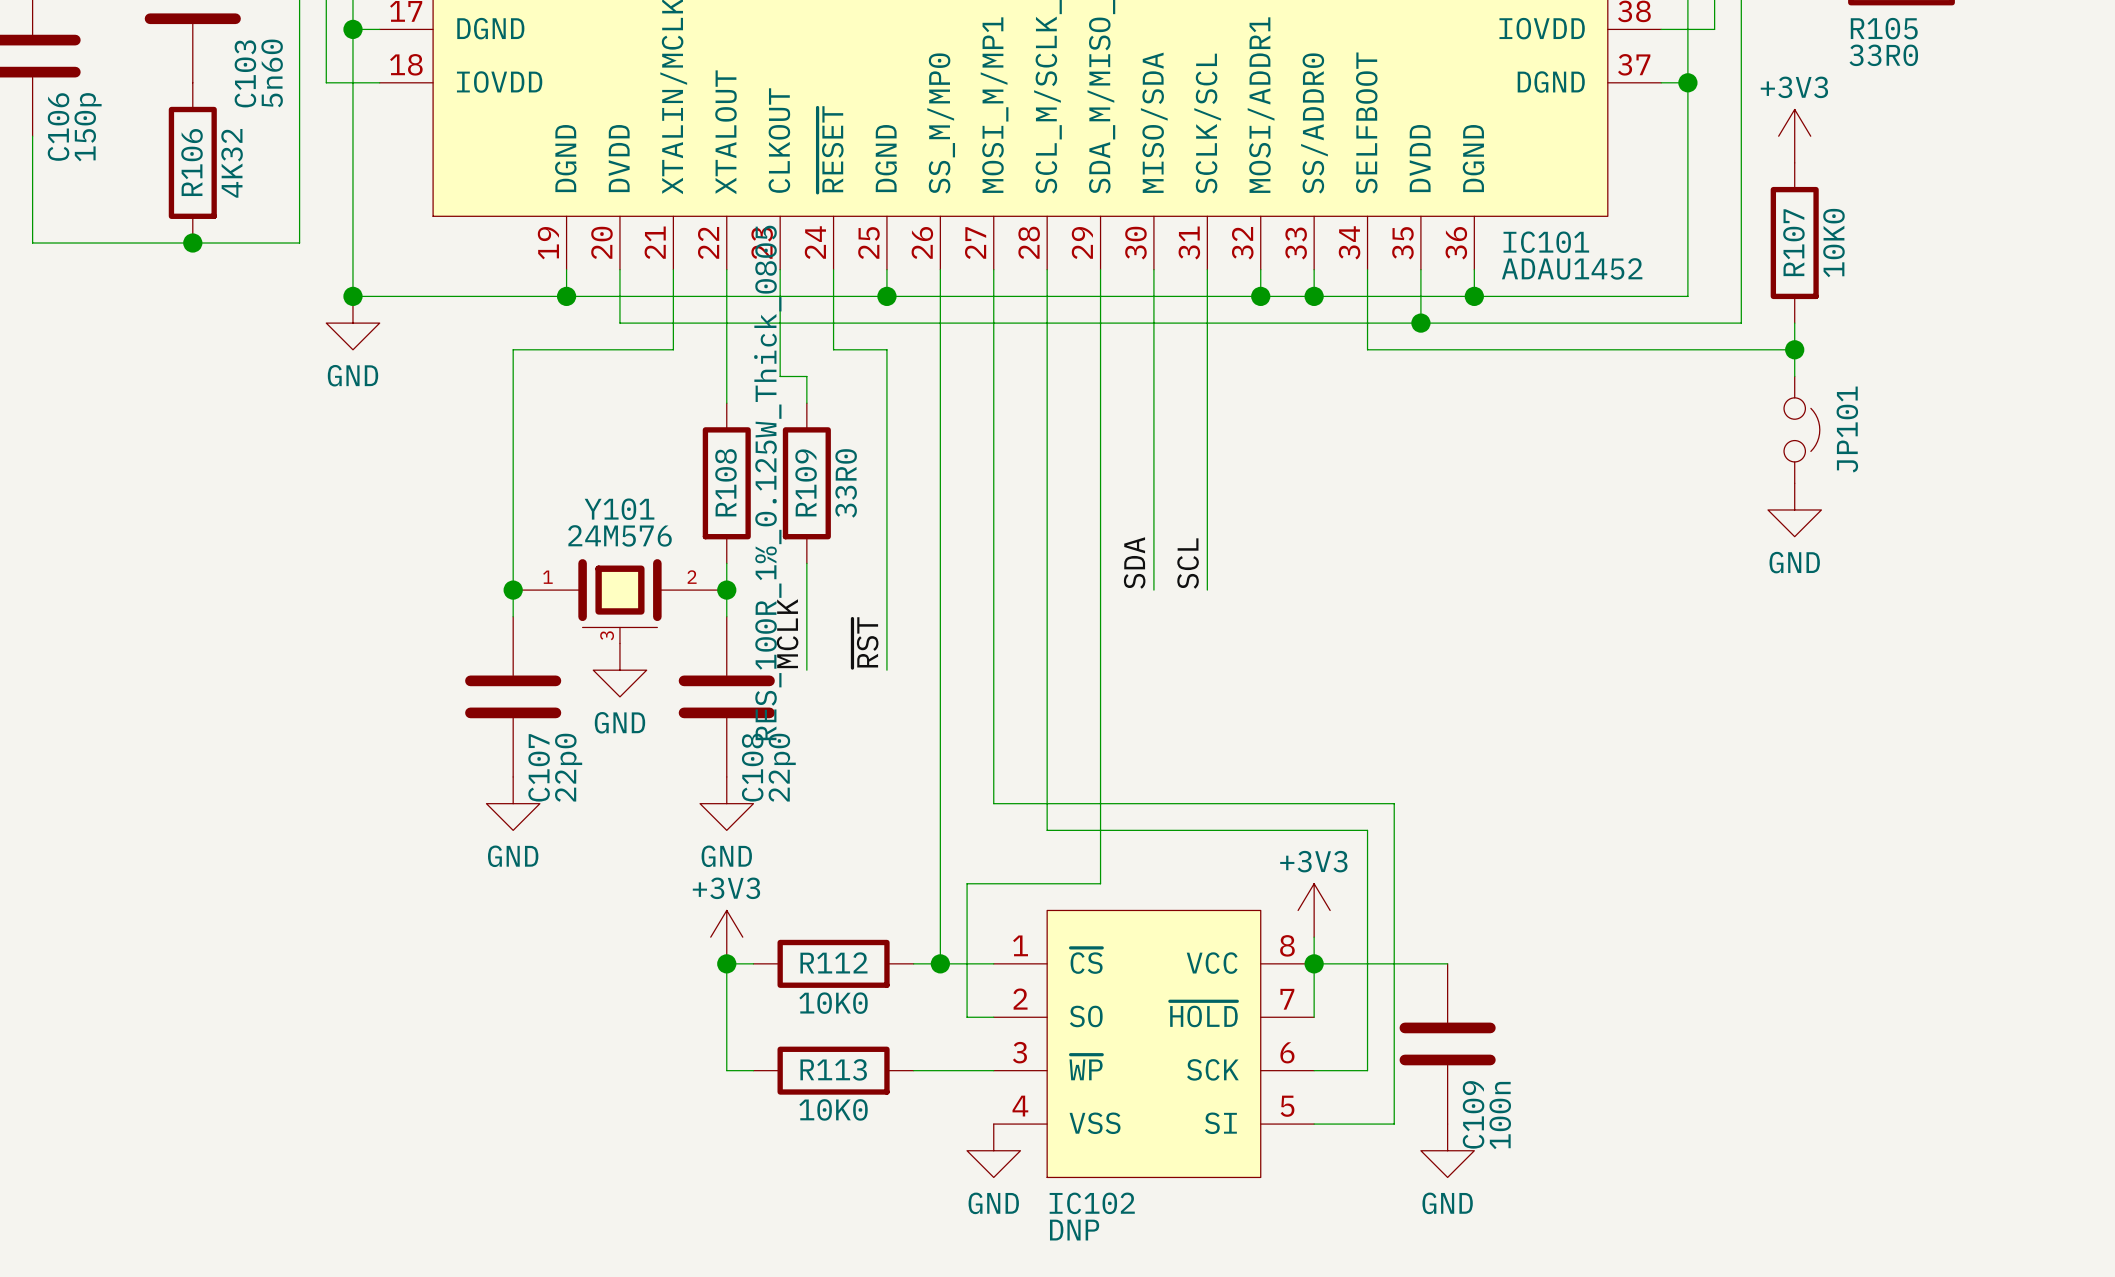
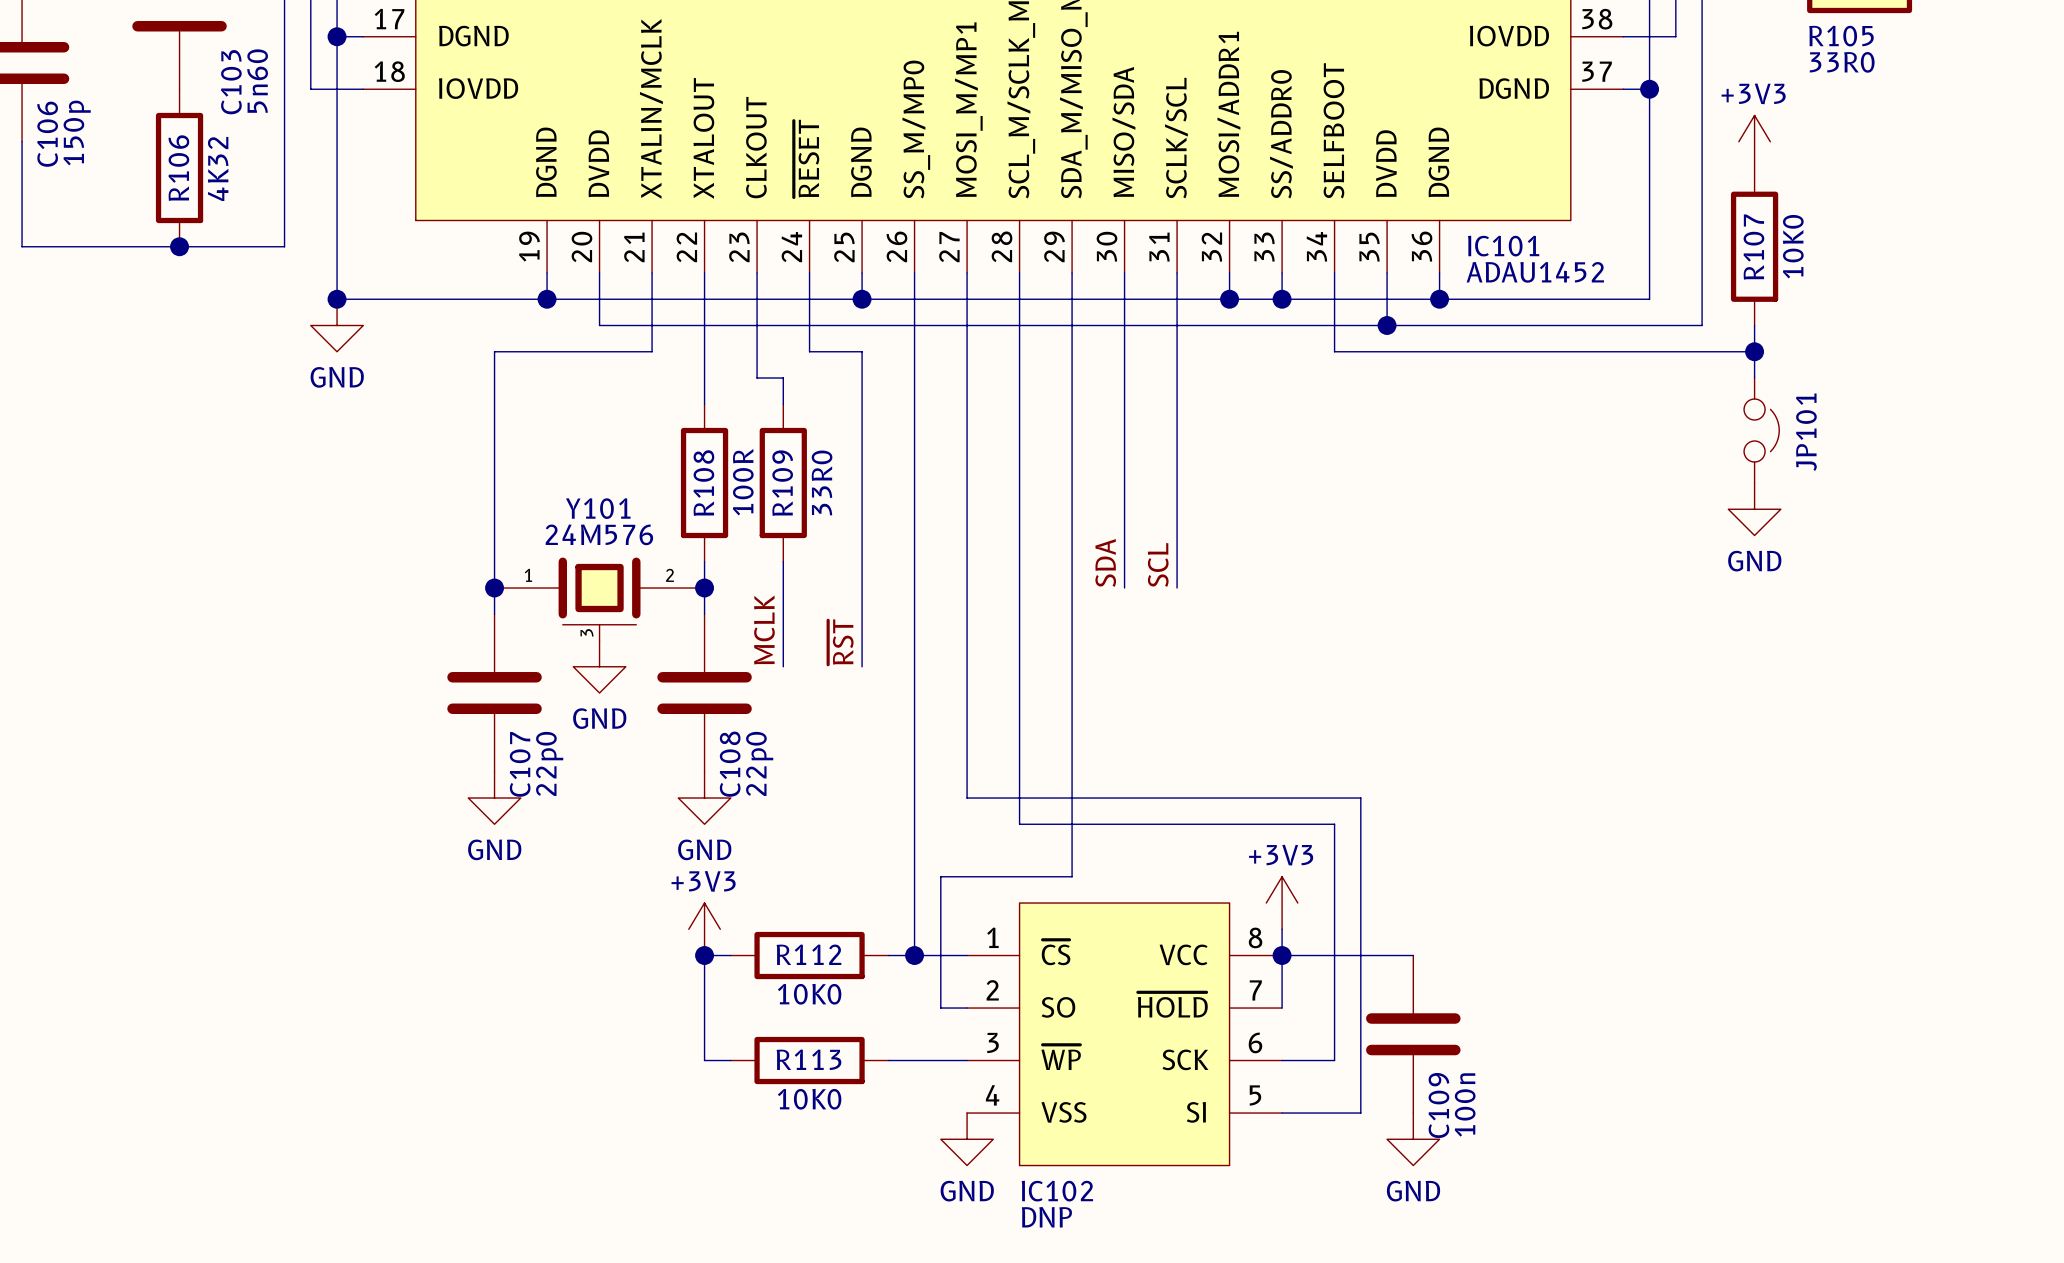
R108 value: RES_100R_1%_0.125W_Thick_0805 (767, 482) -> 100R (743, 482)

